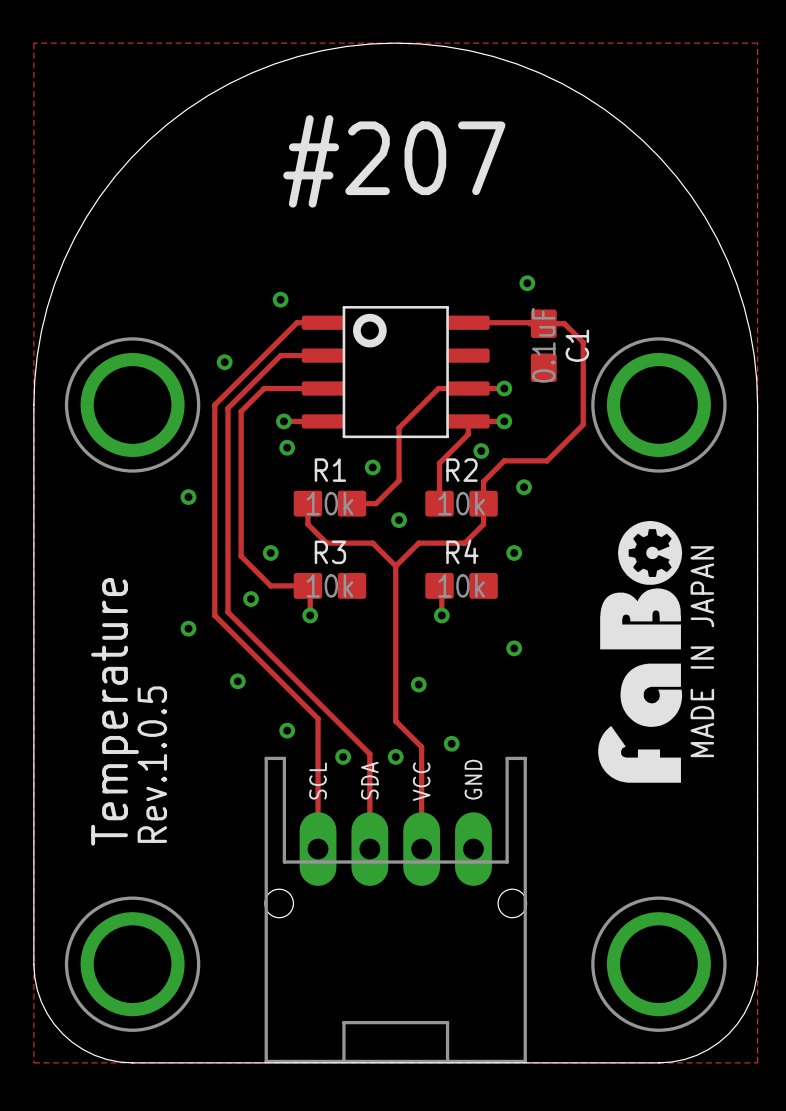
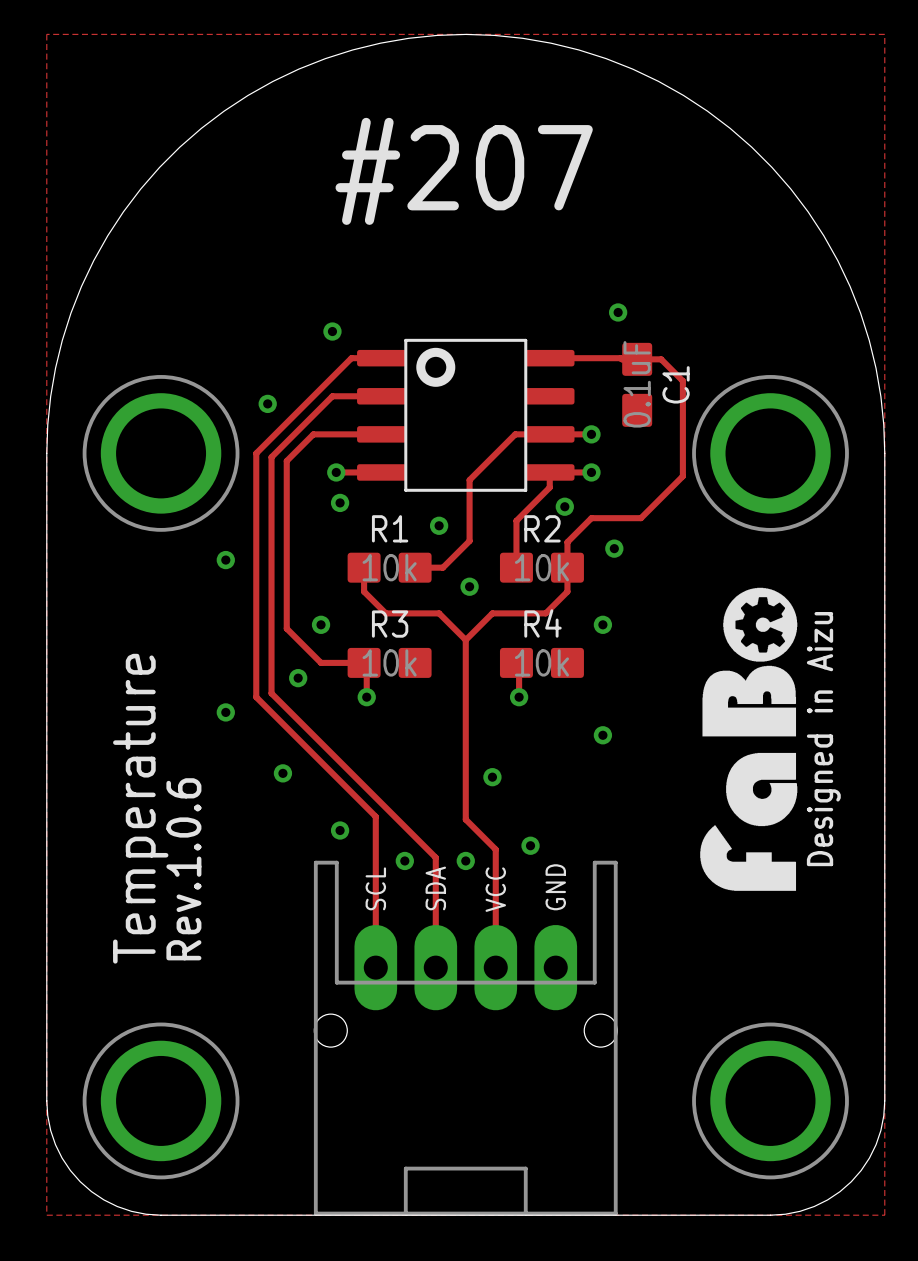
text: MADE IN JAPAN (702, 651) -> Designed in Aizu (823, 739)
text: Rev.1.0.5 (152, 764) -> Rev.1.0.6 (183, 869)

